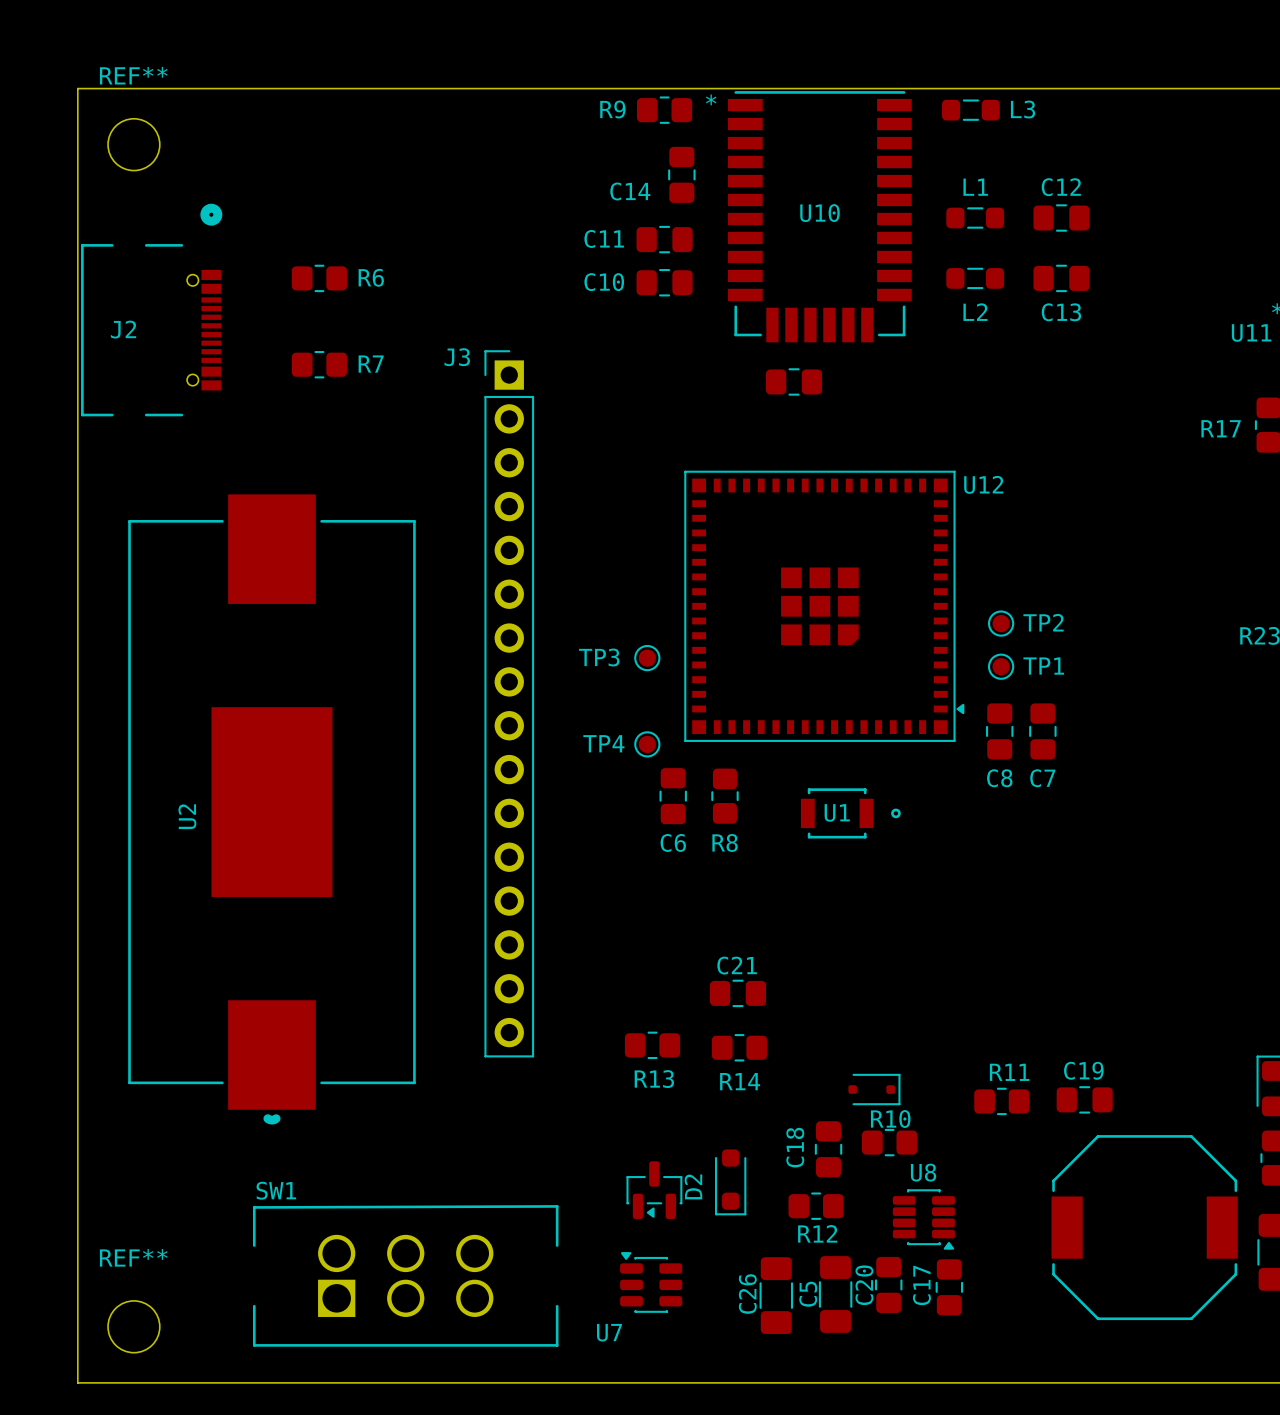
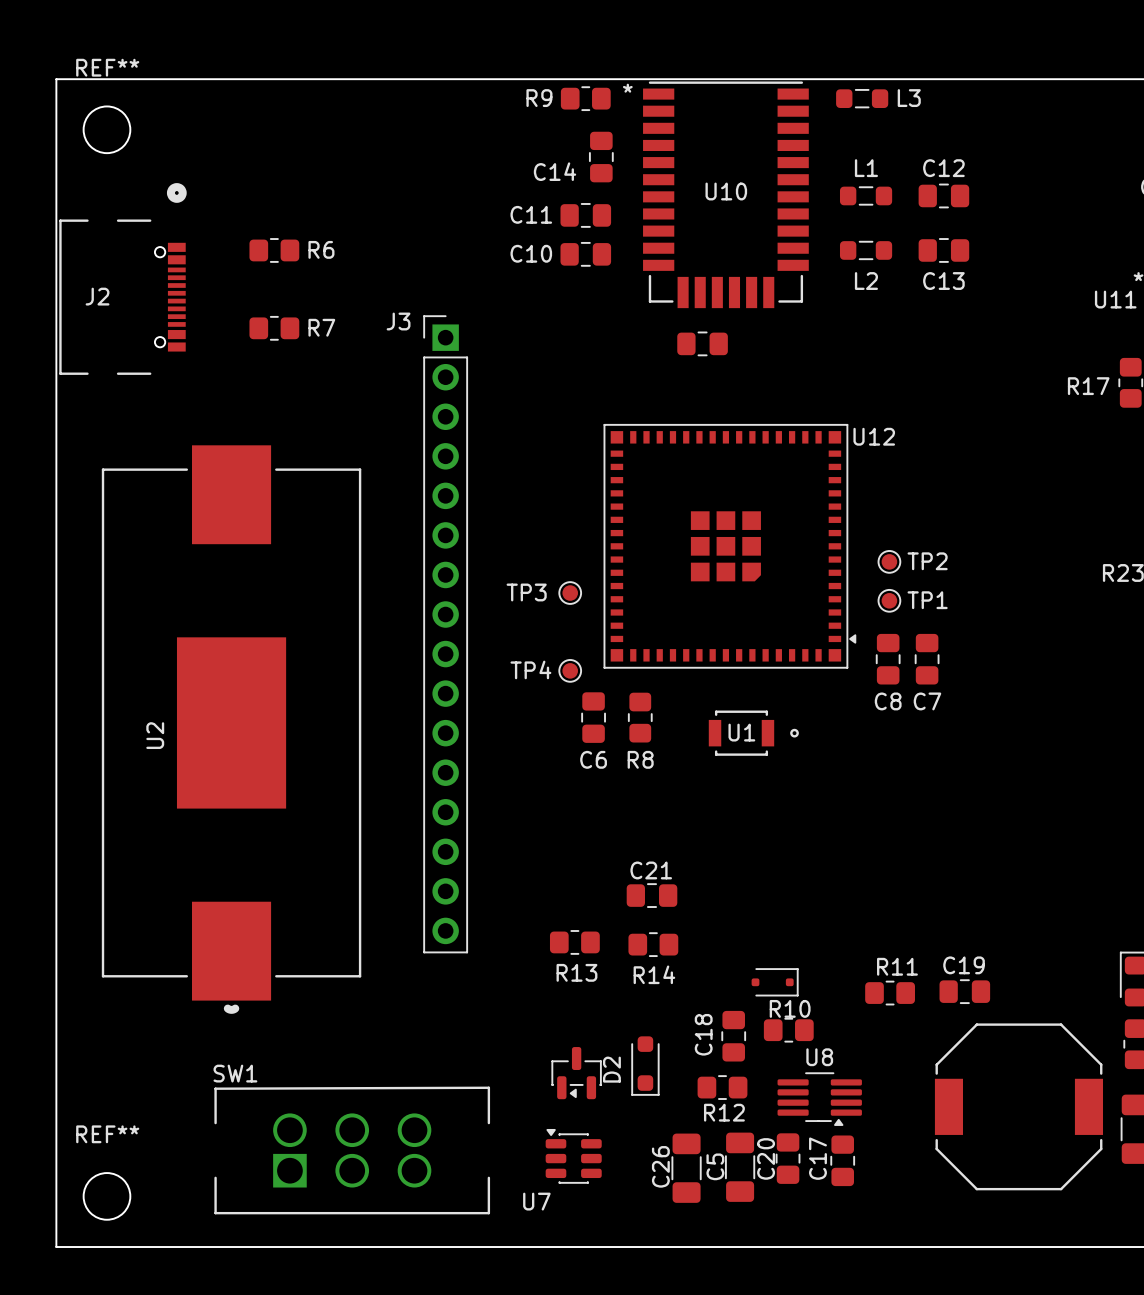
U8 footprint: [892, 1189, 955, 1250] -> [777, 1072, 862, 1126]

